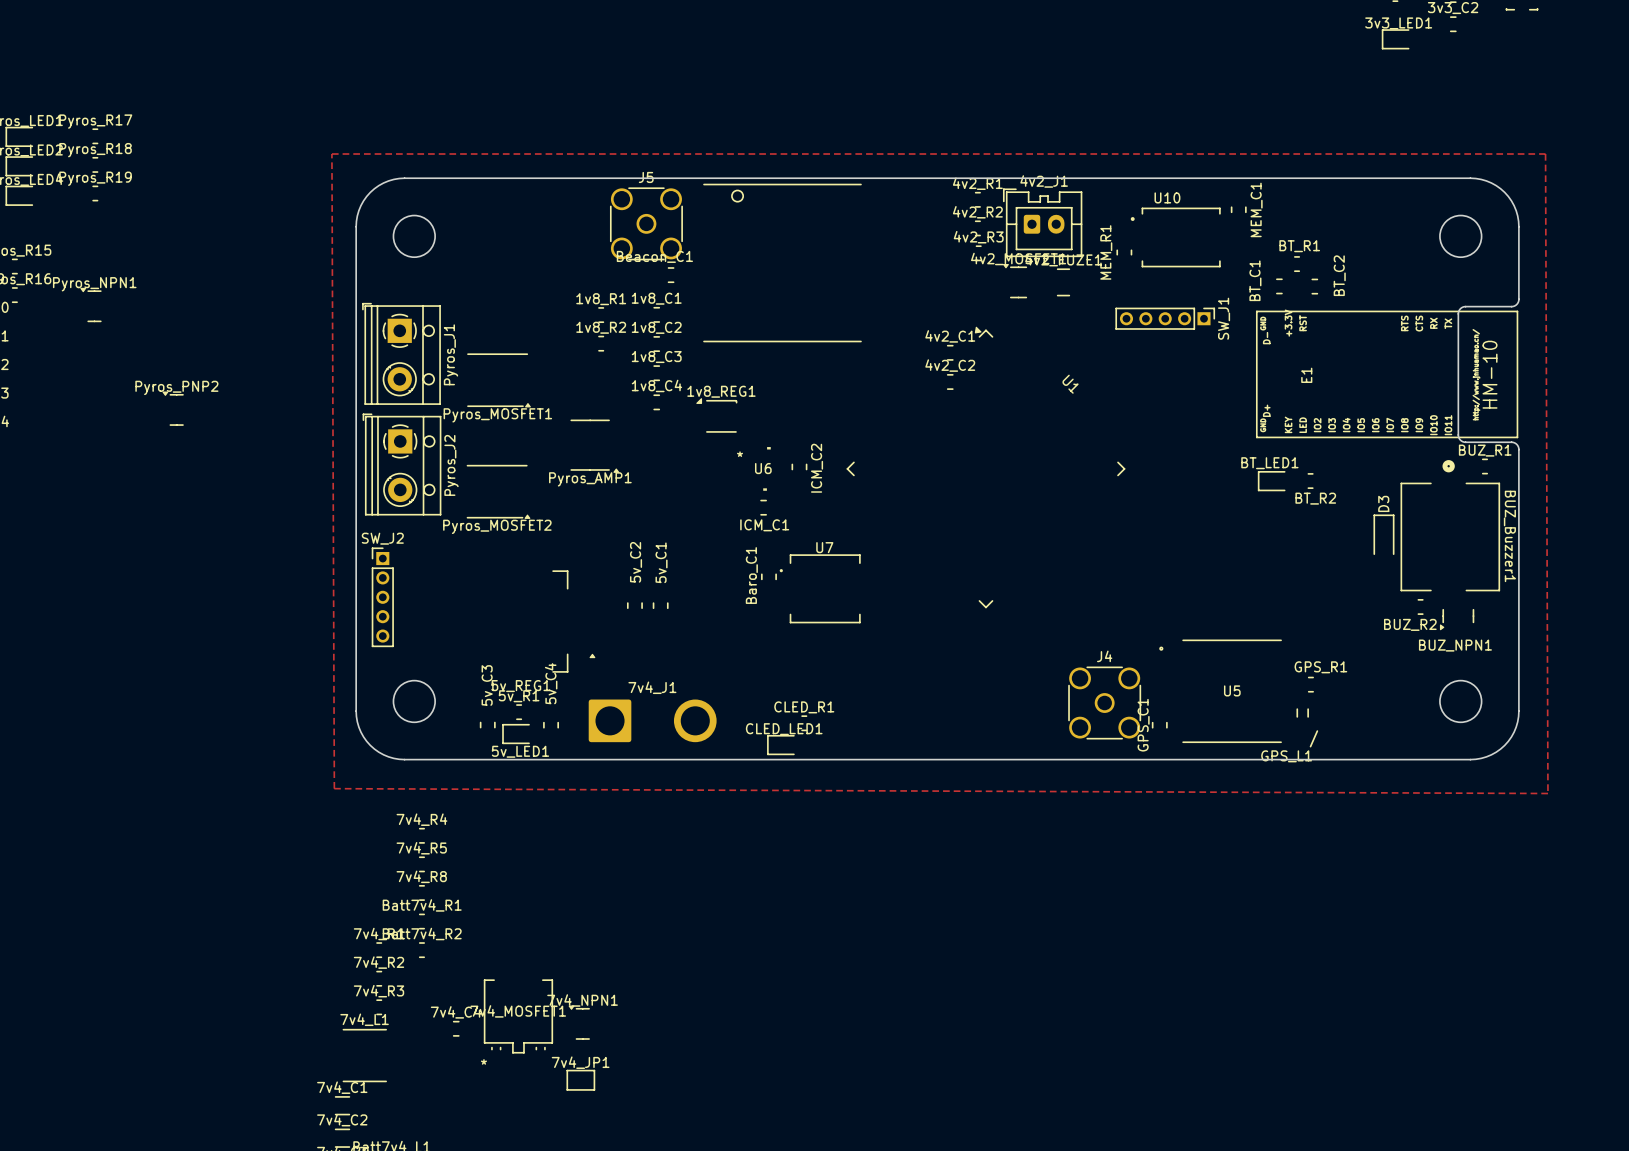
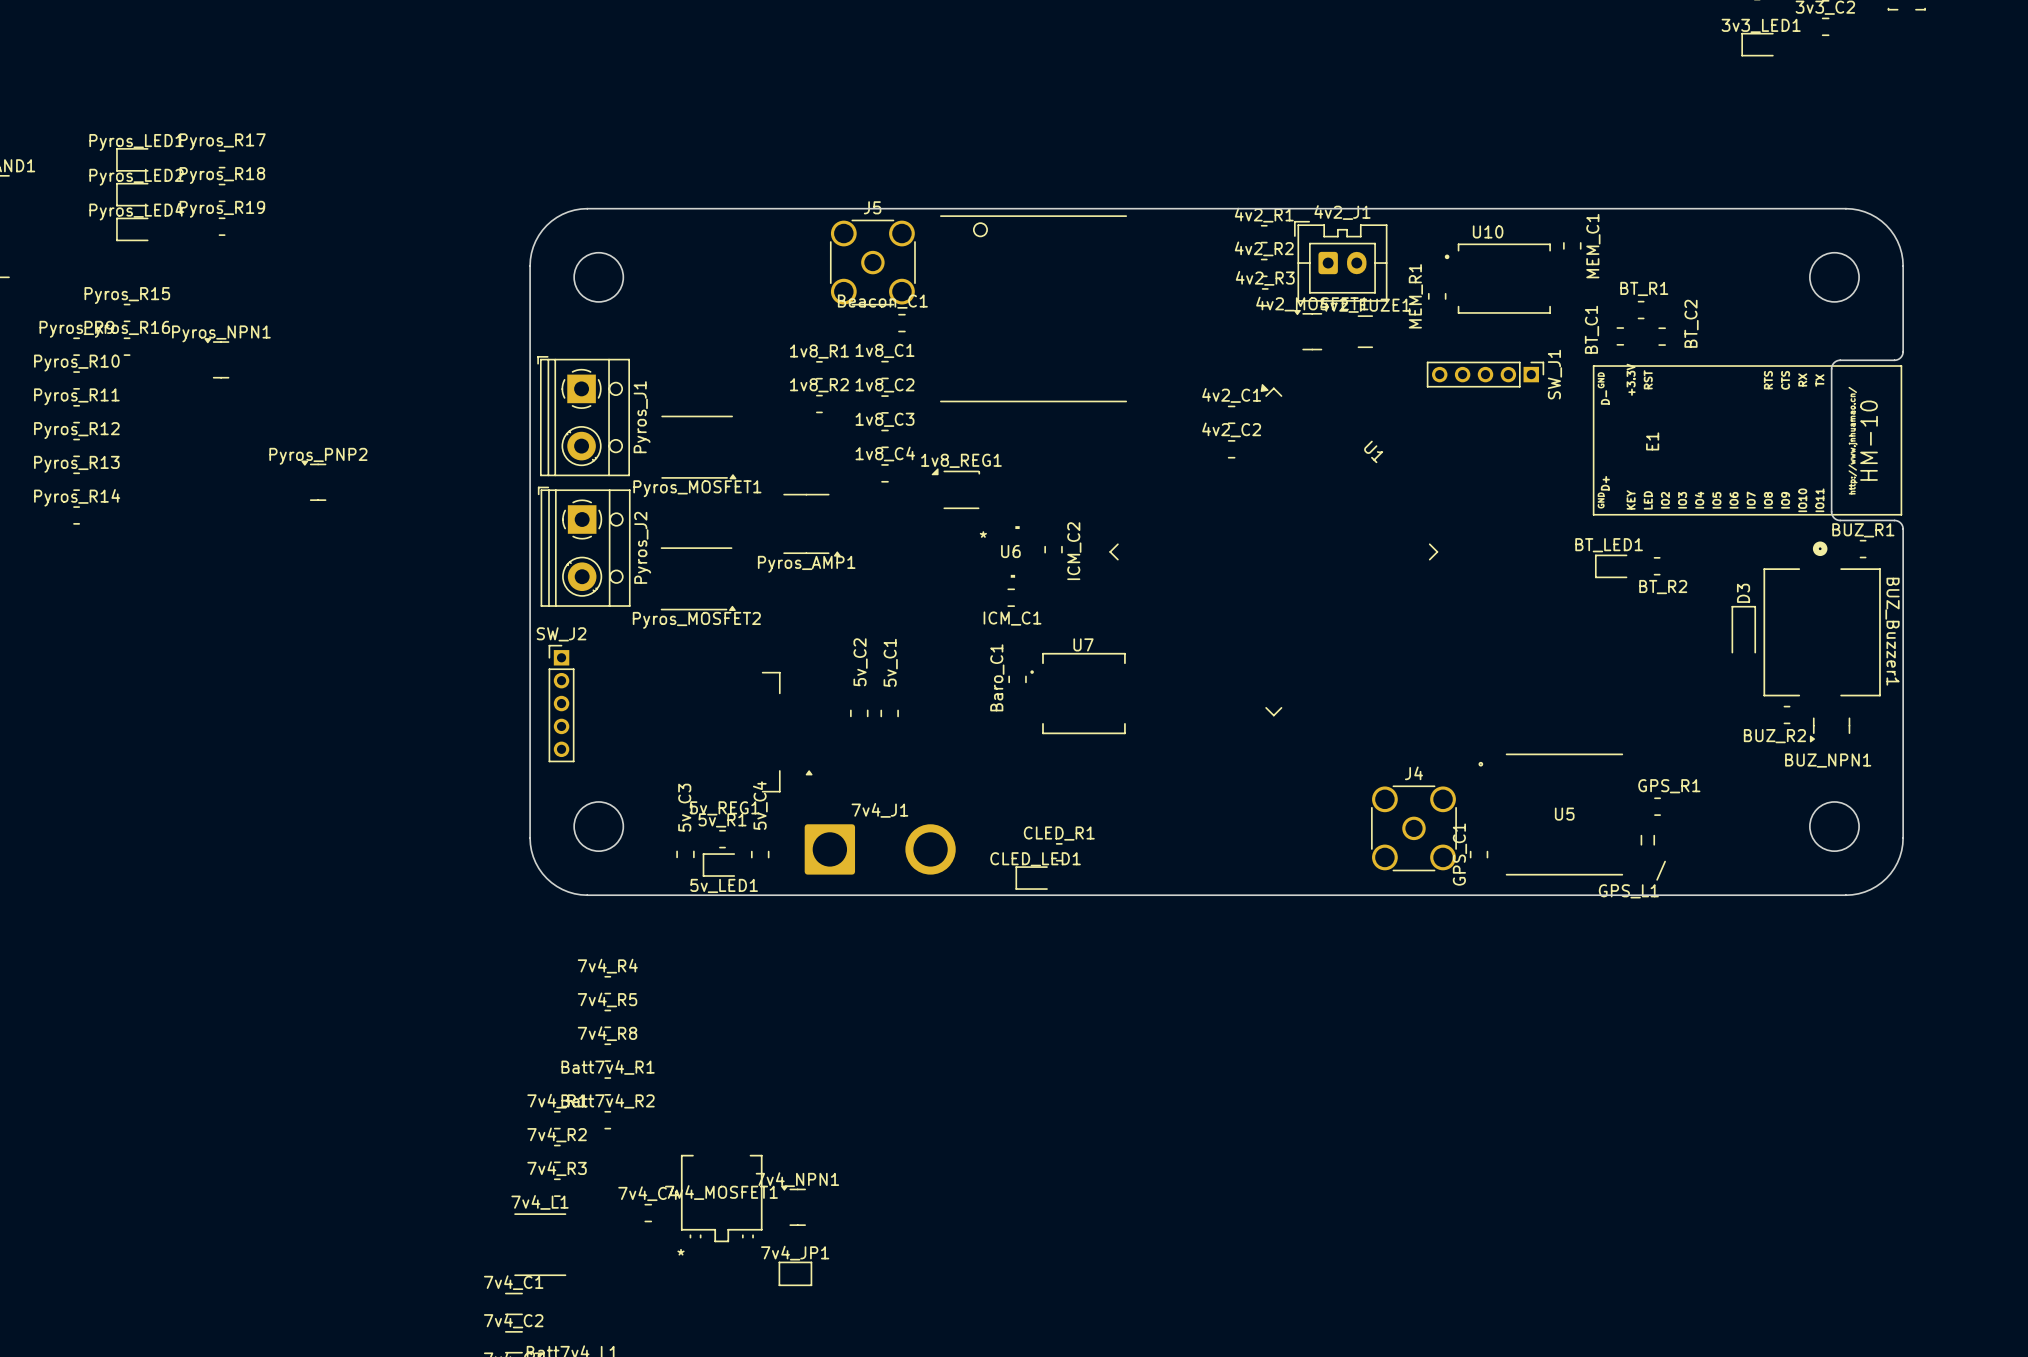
zone outline: (331, 154) (1545, 154) (1547, 793) (334, 788) (331, 154) -> none

